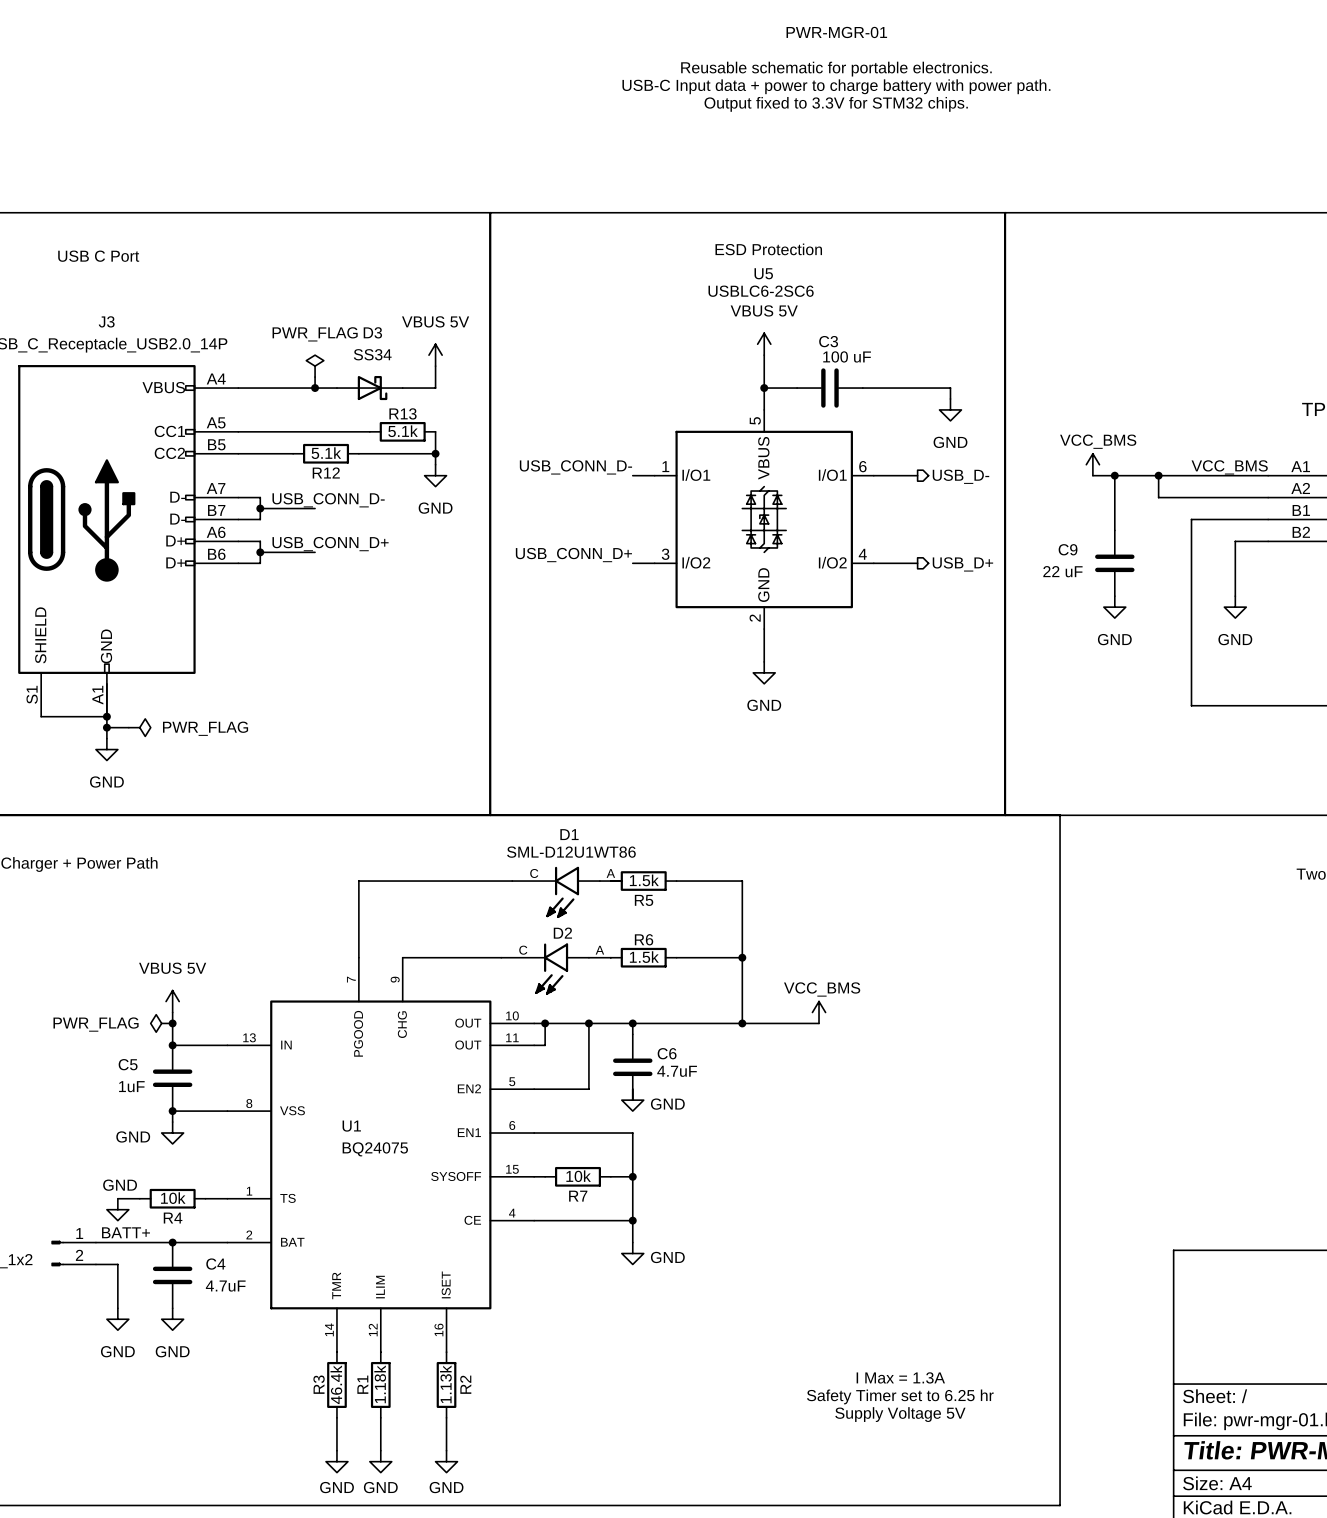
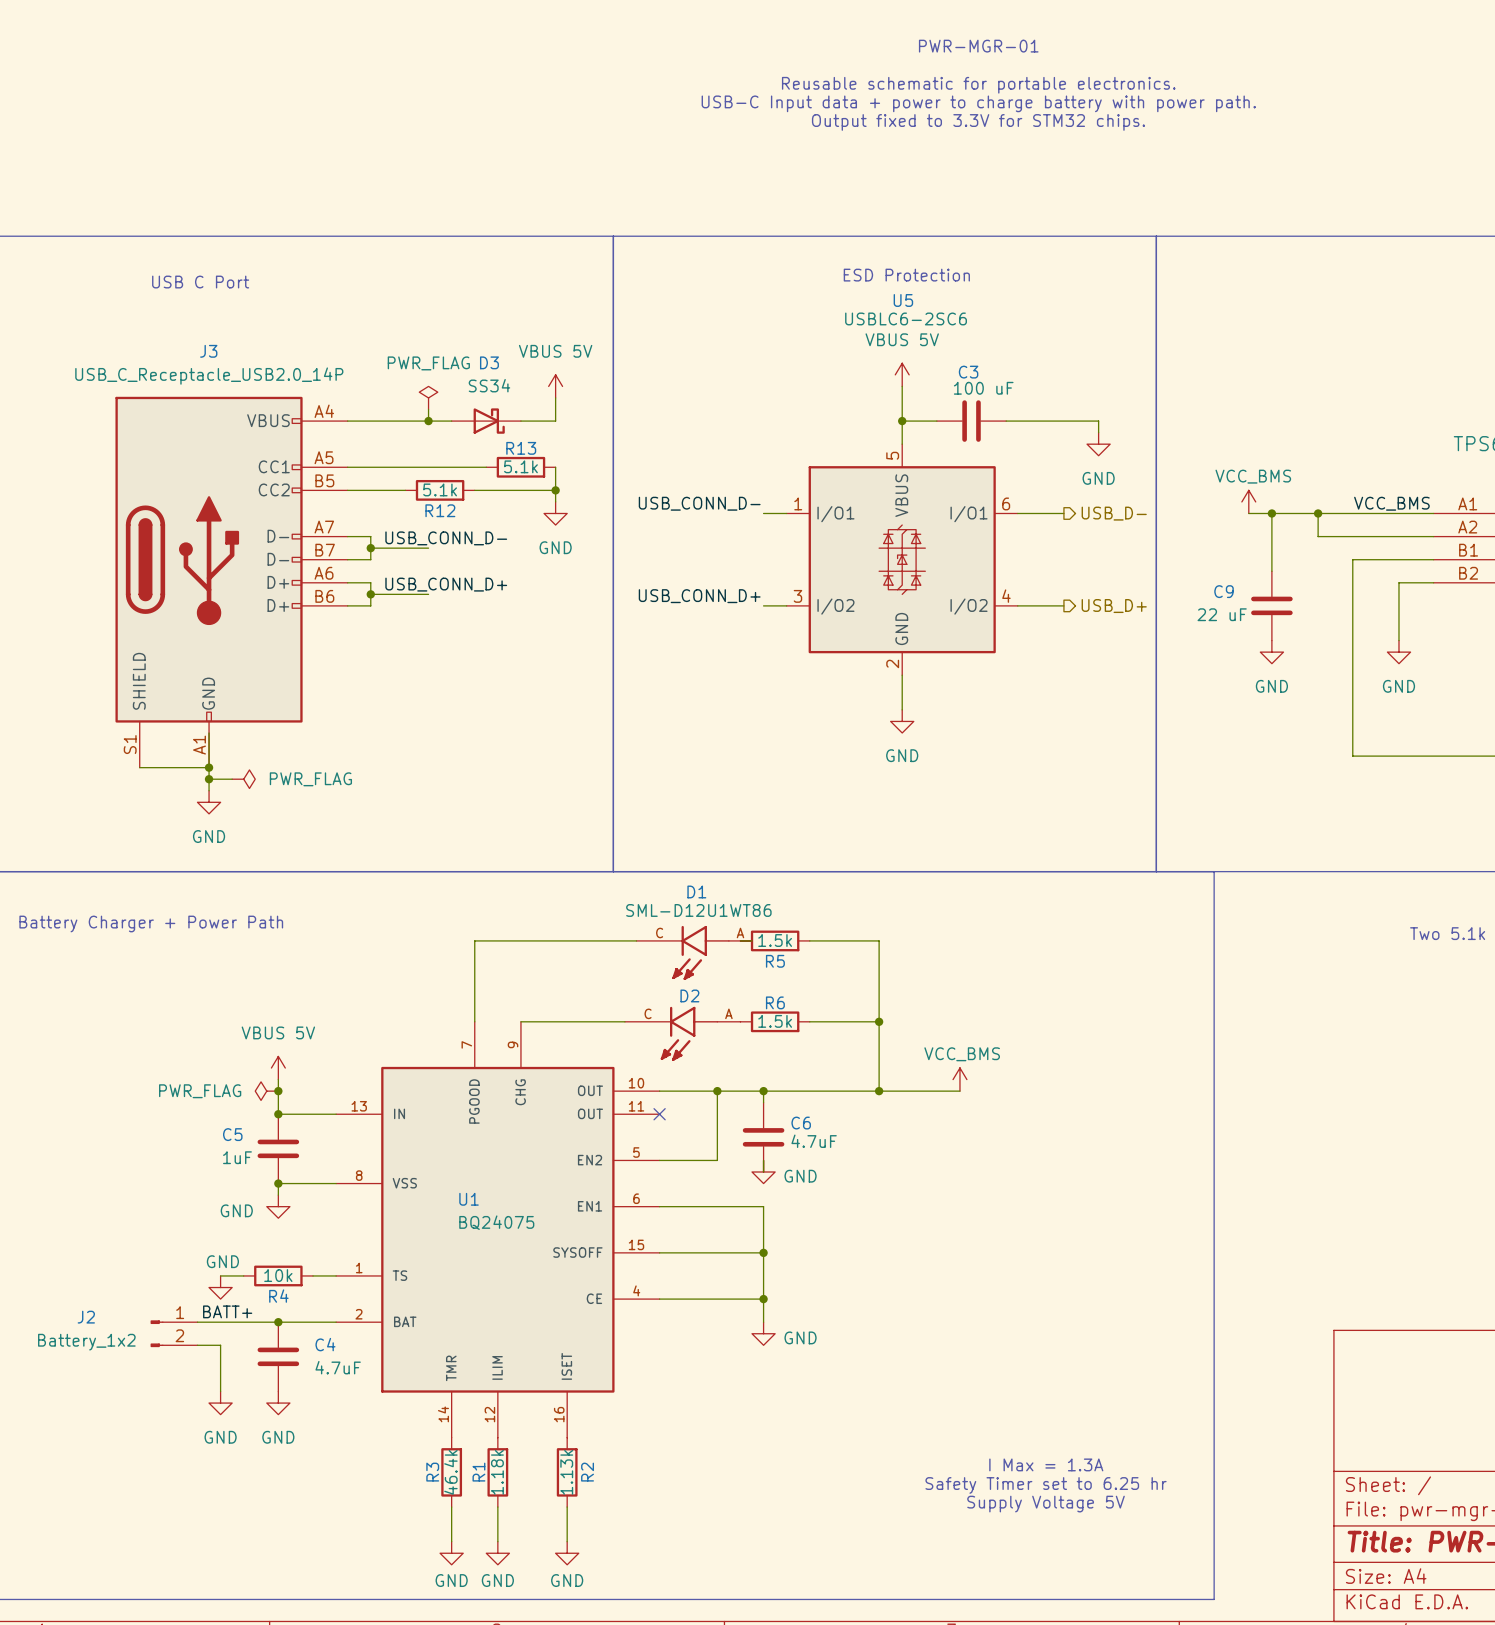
wire: (545, 1023) (545, 1045) (534, 1045) -> none
junction: (545, 1023) -> none
no-connect mark: none -> (659, 1114)
wire: none -> (671, 1252) (740, 1252)
R7: 10k (577, 1176) -> none

